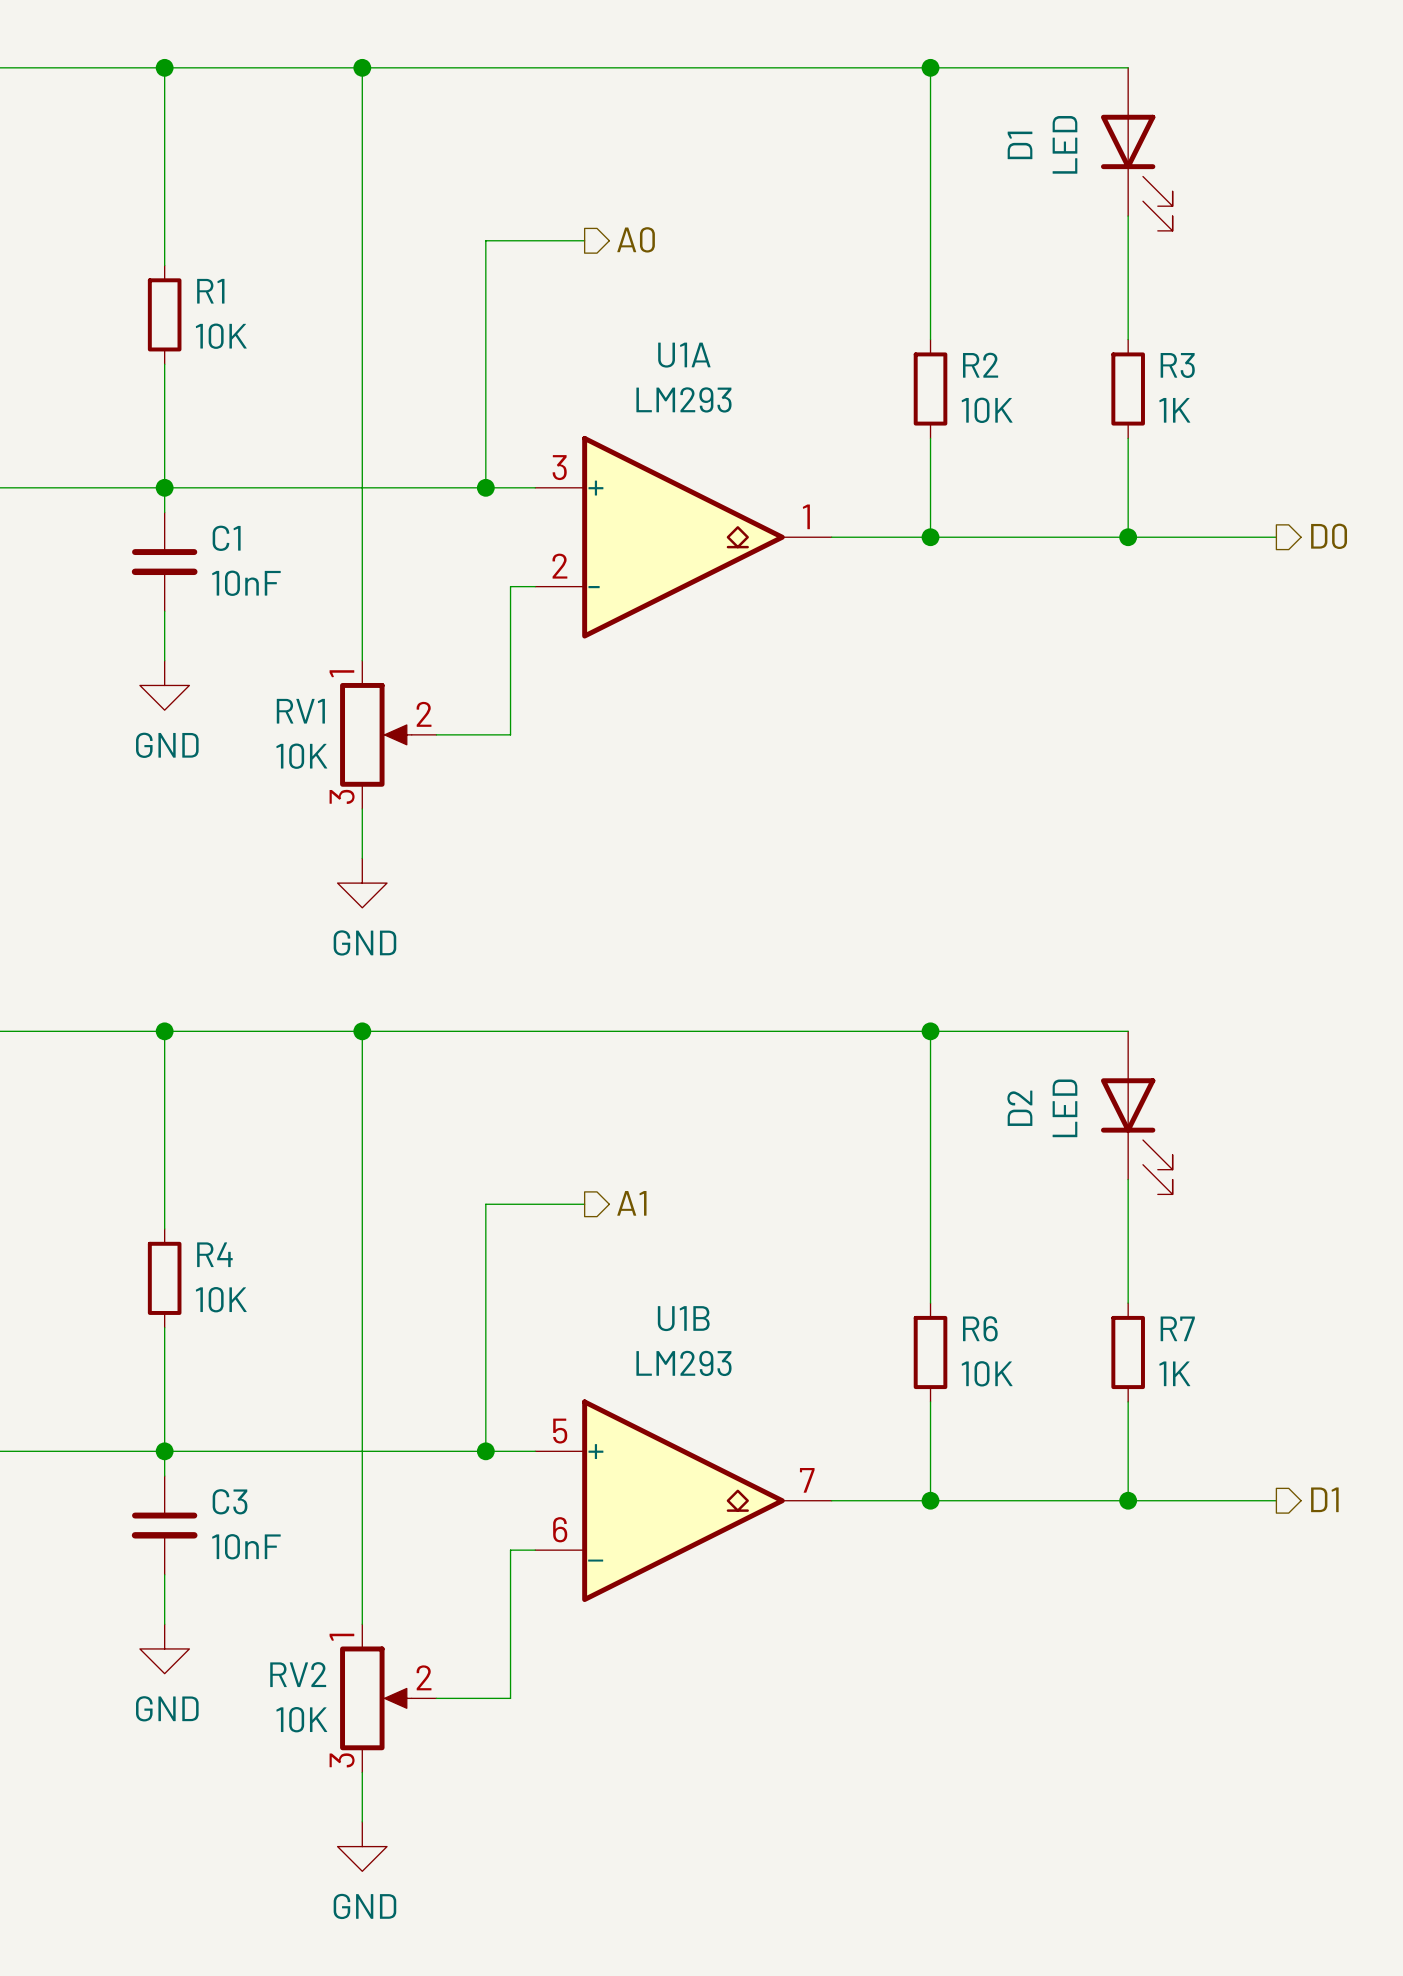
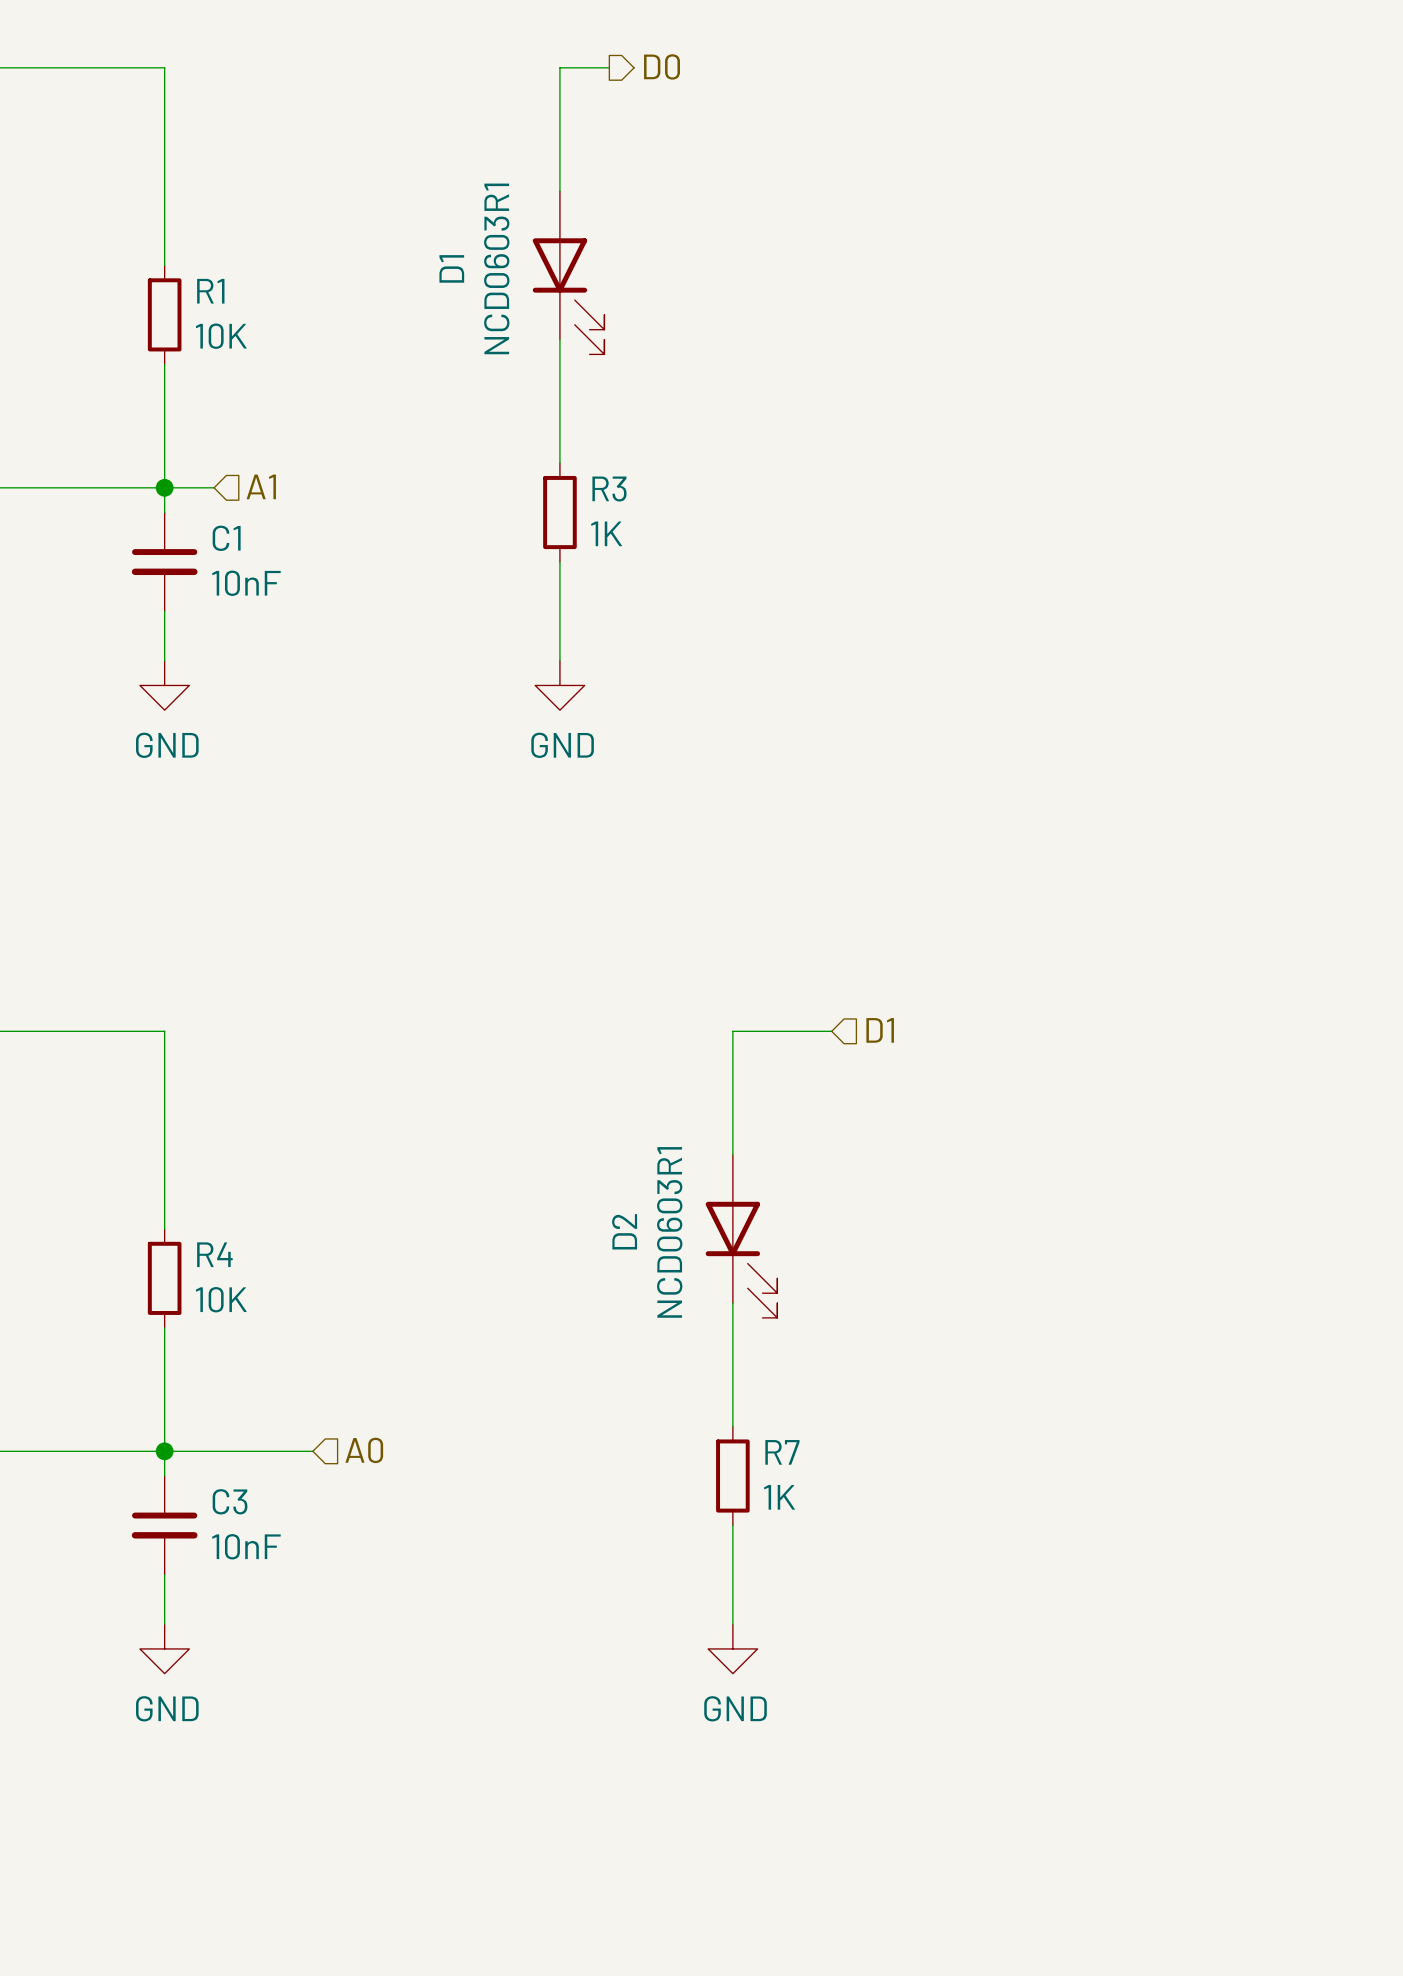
hierarchical label: none -> D0 (662, 66)
wire: (164, 67) (559, 67) -> (559, 191) (559, 67)
junction: (164, 67) -> none
wire: (362, 67) (362, 660) -> none
junction: (362, 67) -> none
wire: (609, 67) (1128, 67) -> none
wire: (930, 67) (930, 339) -> none
junction: (930, 67) -> none
D1 value: LED (1064, 144) -> NCD0603R1 (496, 268)
D1 position: (1136, 149) -> (568, 272)
wire: (1128, 216) (1128, 339) -> none
hierarchical label: A0 (636, 239) -> none
wire: (584, 240) (485, 240) (485, 487) -> none
wire: none -> (559, 339) (559, 463)
R2: 10K (930, 389) -> none
R3 position: (1128, 389) -> (559, 512)
wire: (930, 438) (930, 537) -> (559, 561) (559, 660)
wire: (1128, 438) (1128, 537) -> none
hierarchical label: none -> A1 (261, 486)
wire: (214, 487) (535, 487) -> none
junction: (485, 487) -> none
hierarchical label: D0 (1329, 536) -> none
U1A: LM293 (683, 537) -> none
wire: (831, 537) (1276, 537) -> none
junction: (930, 537) -> none
junction: (1128, 537) -> none
wire: (535, 586) (510, 586) (510, 734) (436, 734) -> none
RV1: 10K (388, 734) -> none
wire: (362, 808) (362, 858) -> none
power symbol position: GND (362, 883) -> GND (559, 685)
hierarchical label: none -> D1 (880, 1030)
wire: (164, 1031) (732, 1031) -> (732, 1154) (732, 1031)
junction: (164, 1031) -> none
wire: (362, 1031) (362, 1624) -> none
junction: (362, 1031) -> none
wire: (831, 1031) (1128, 1031) -> none
wire: (930, 1031) (930, 1303) -> none
junction: (930, 1031) -> none
D2 value: LED (1064, 1108) -> NCD0603R1 (669, 1232)
D2 position: (1136, 1112) -> (741, 1236)
wire: (1128, 1179) (1128, 1303) -> (732, 1303) (732, 1426)
hierarchical label: A1 (631, 1203) -> none
wire: (584, 1204) (485, 1204) (485, 1451) -> none
R6: 10K (930, 1352) -> none
R7 position: (1128, 1352) -> (732, 1476)
wire: (930, 1401) (930, 1500) -> none
wire: (1128, 1401) (1128, 1500) -> (732, 1525) (732, 1624)
hierarchical label: none -> A0 (364, 1450)
wire: (312, 1451) (535, 1451) -> none
junction: (485, 1451) -> none
hierarchical label: D1 (1324, 1499) -> none
U1B: LM293 (683, 1500) -> none
wire: (831, 1500) (1276, 1500) -> none
junction: (930, 1500) -> none
junction: (1128, 1500) -> none
wire: (535, 1550) (510, 1550) (510, 1698) (436, 1698) -> none
RV2: 10K (388, 1698) -> none
wire: (362, 1772) (362, 1821) -> none
power symbol position: GND (362, 1846) -> GND (732, 1648)

